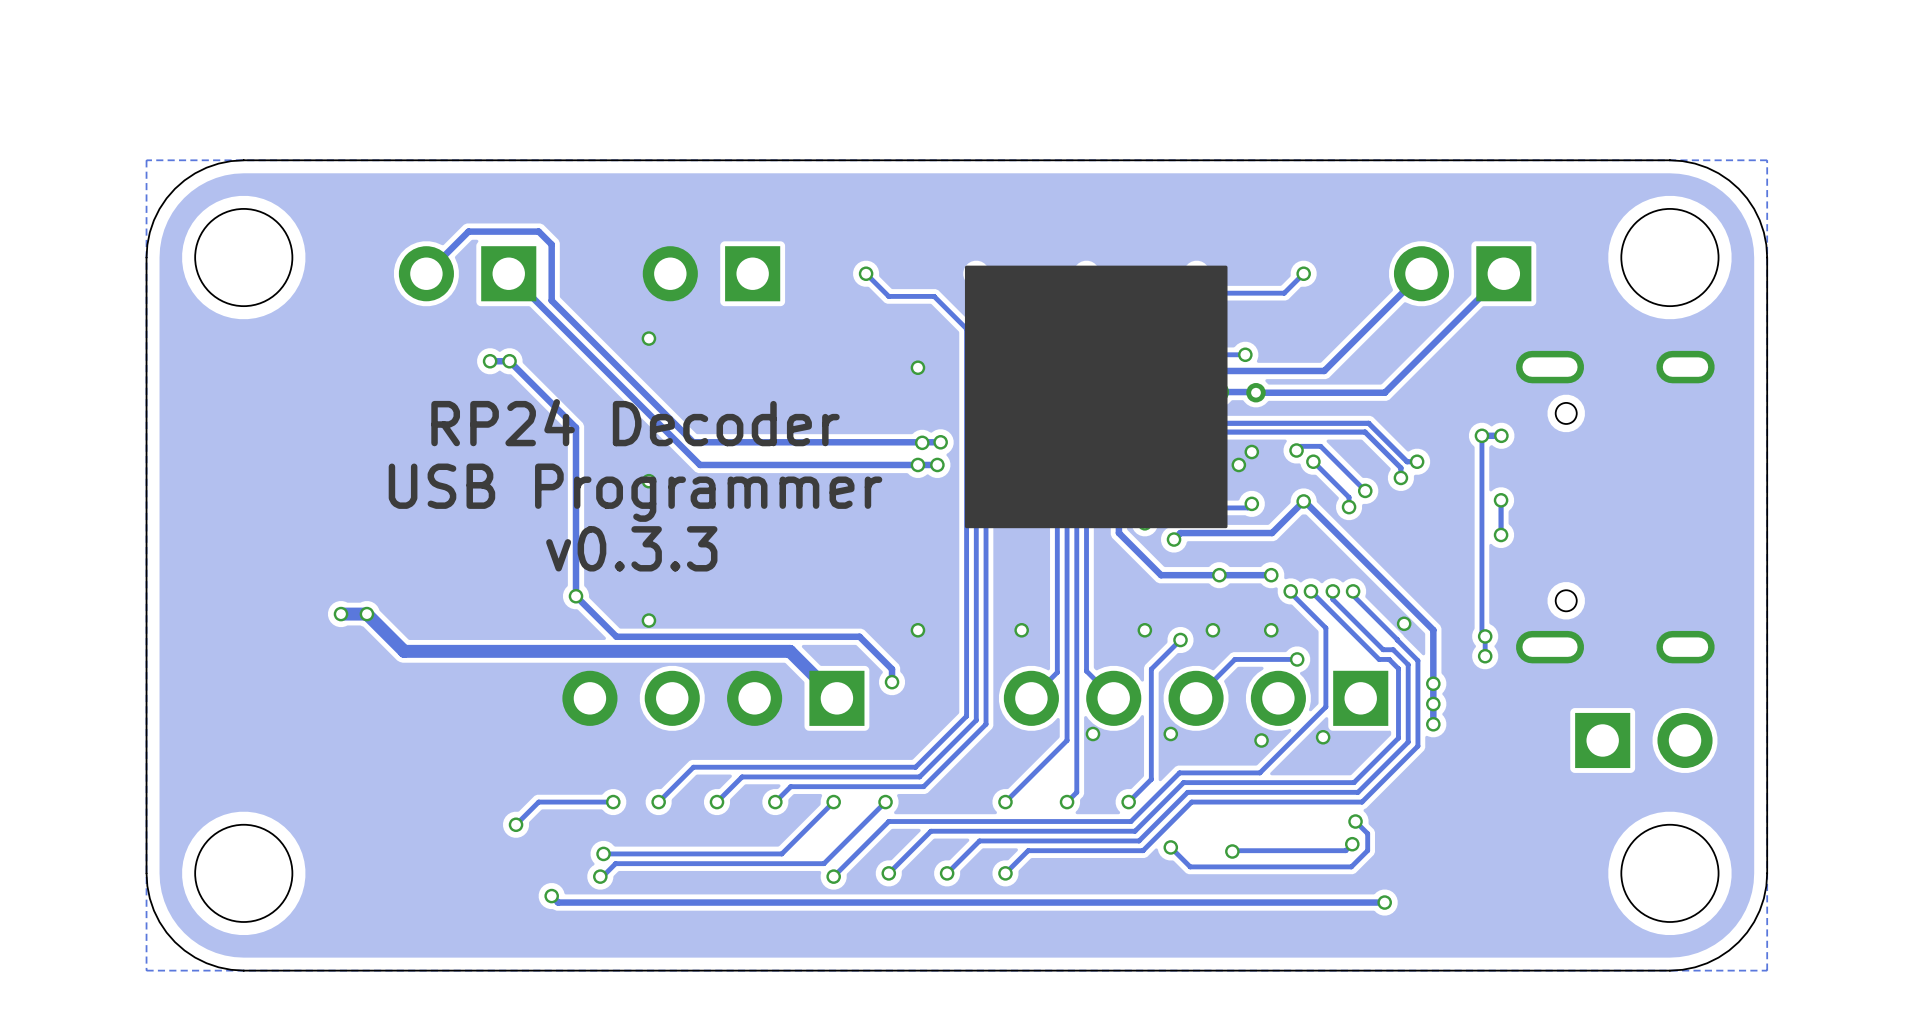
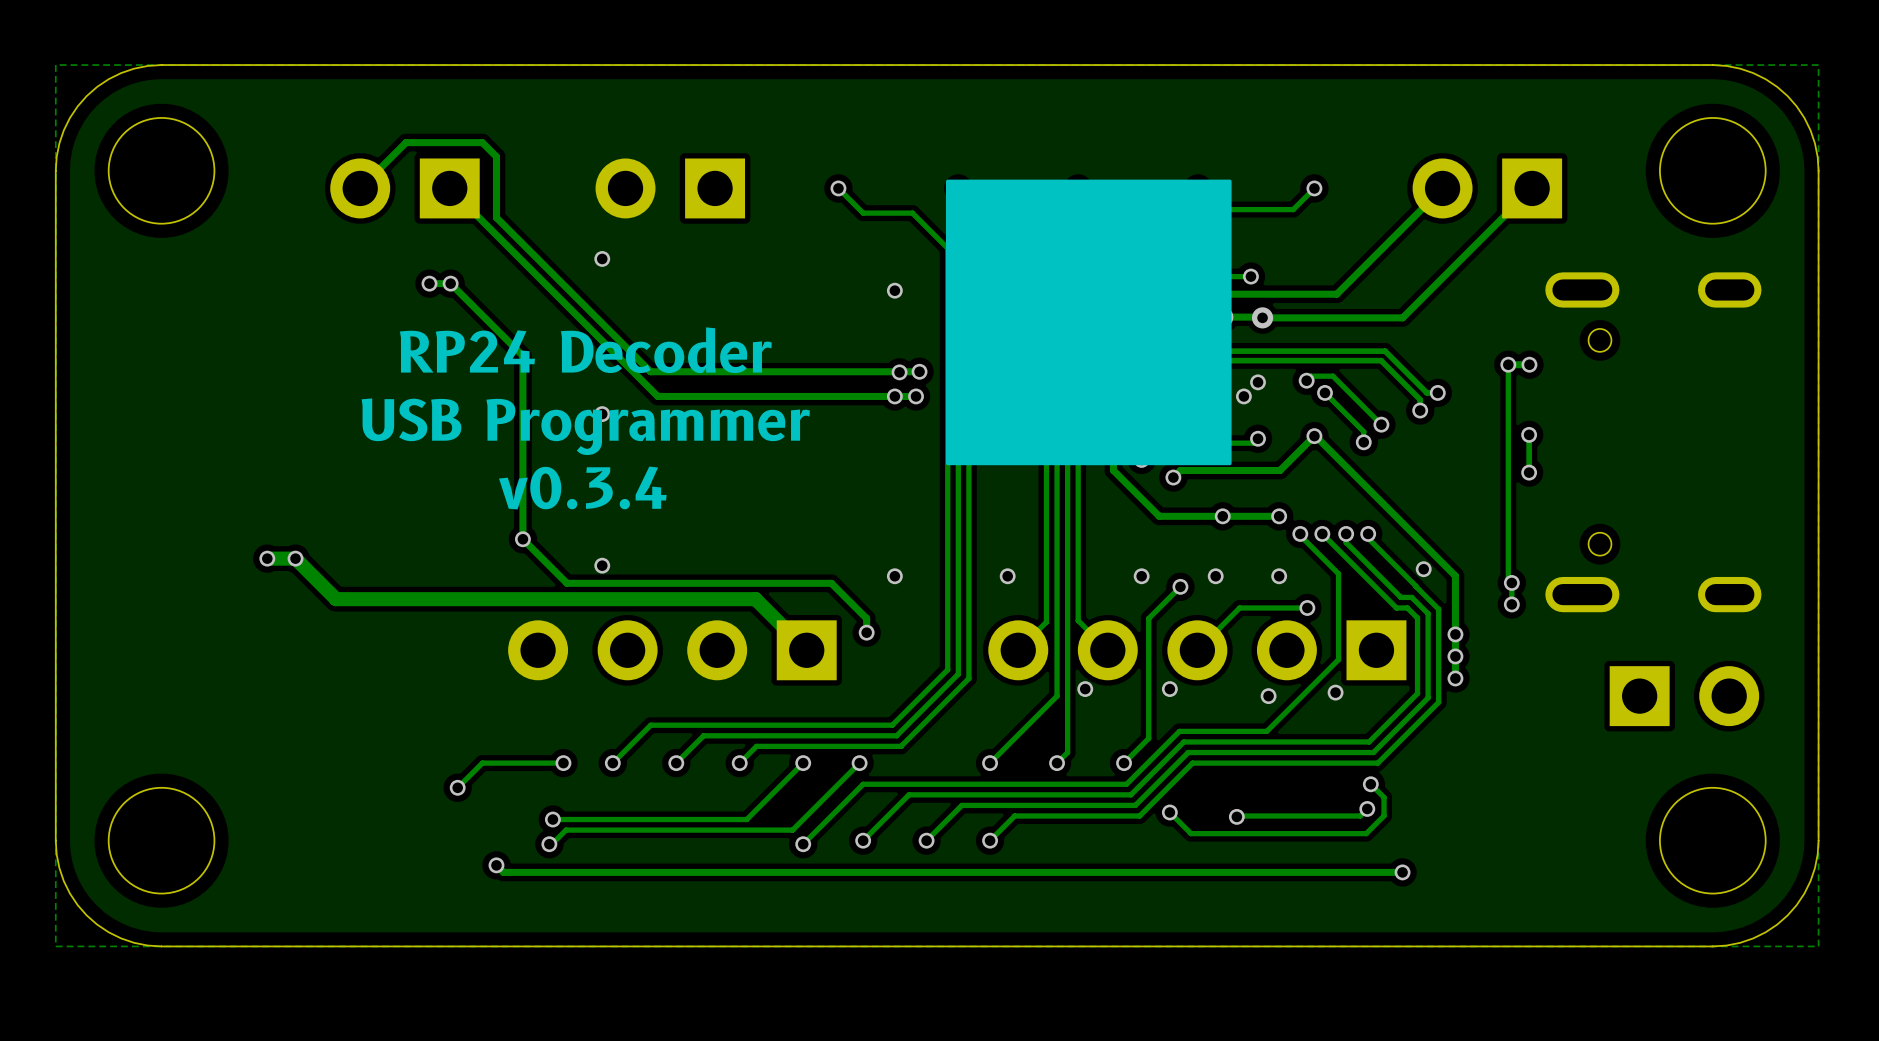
text: v0.3.3 (631, 548) -> v0.3.4 (582, 488)

